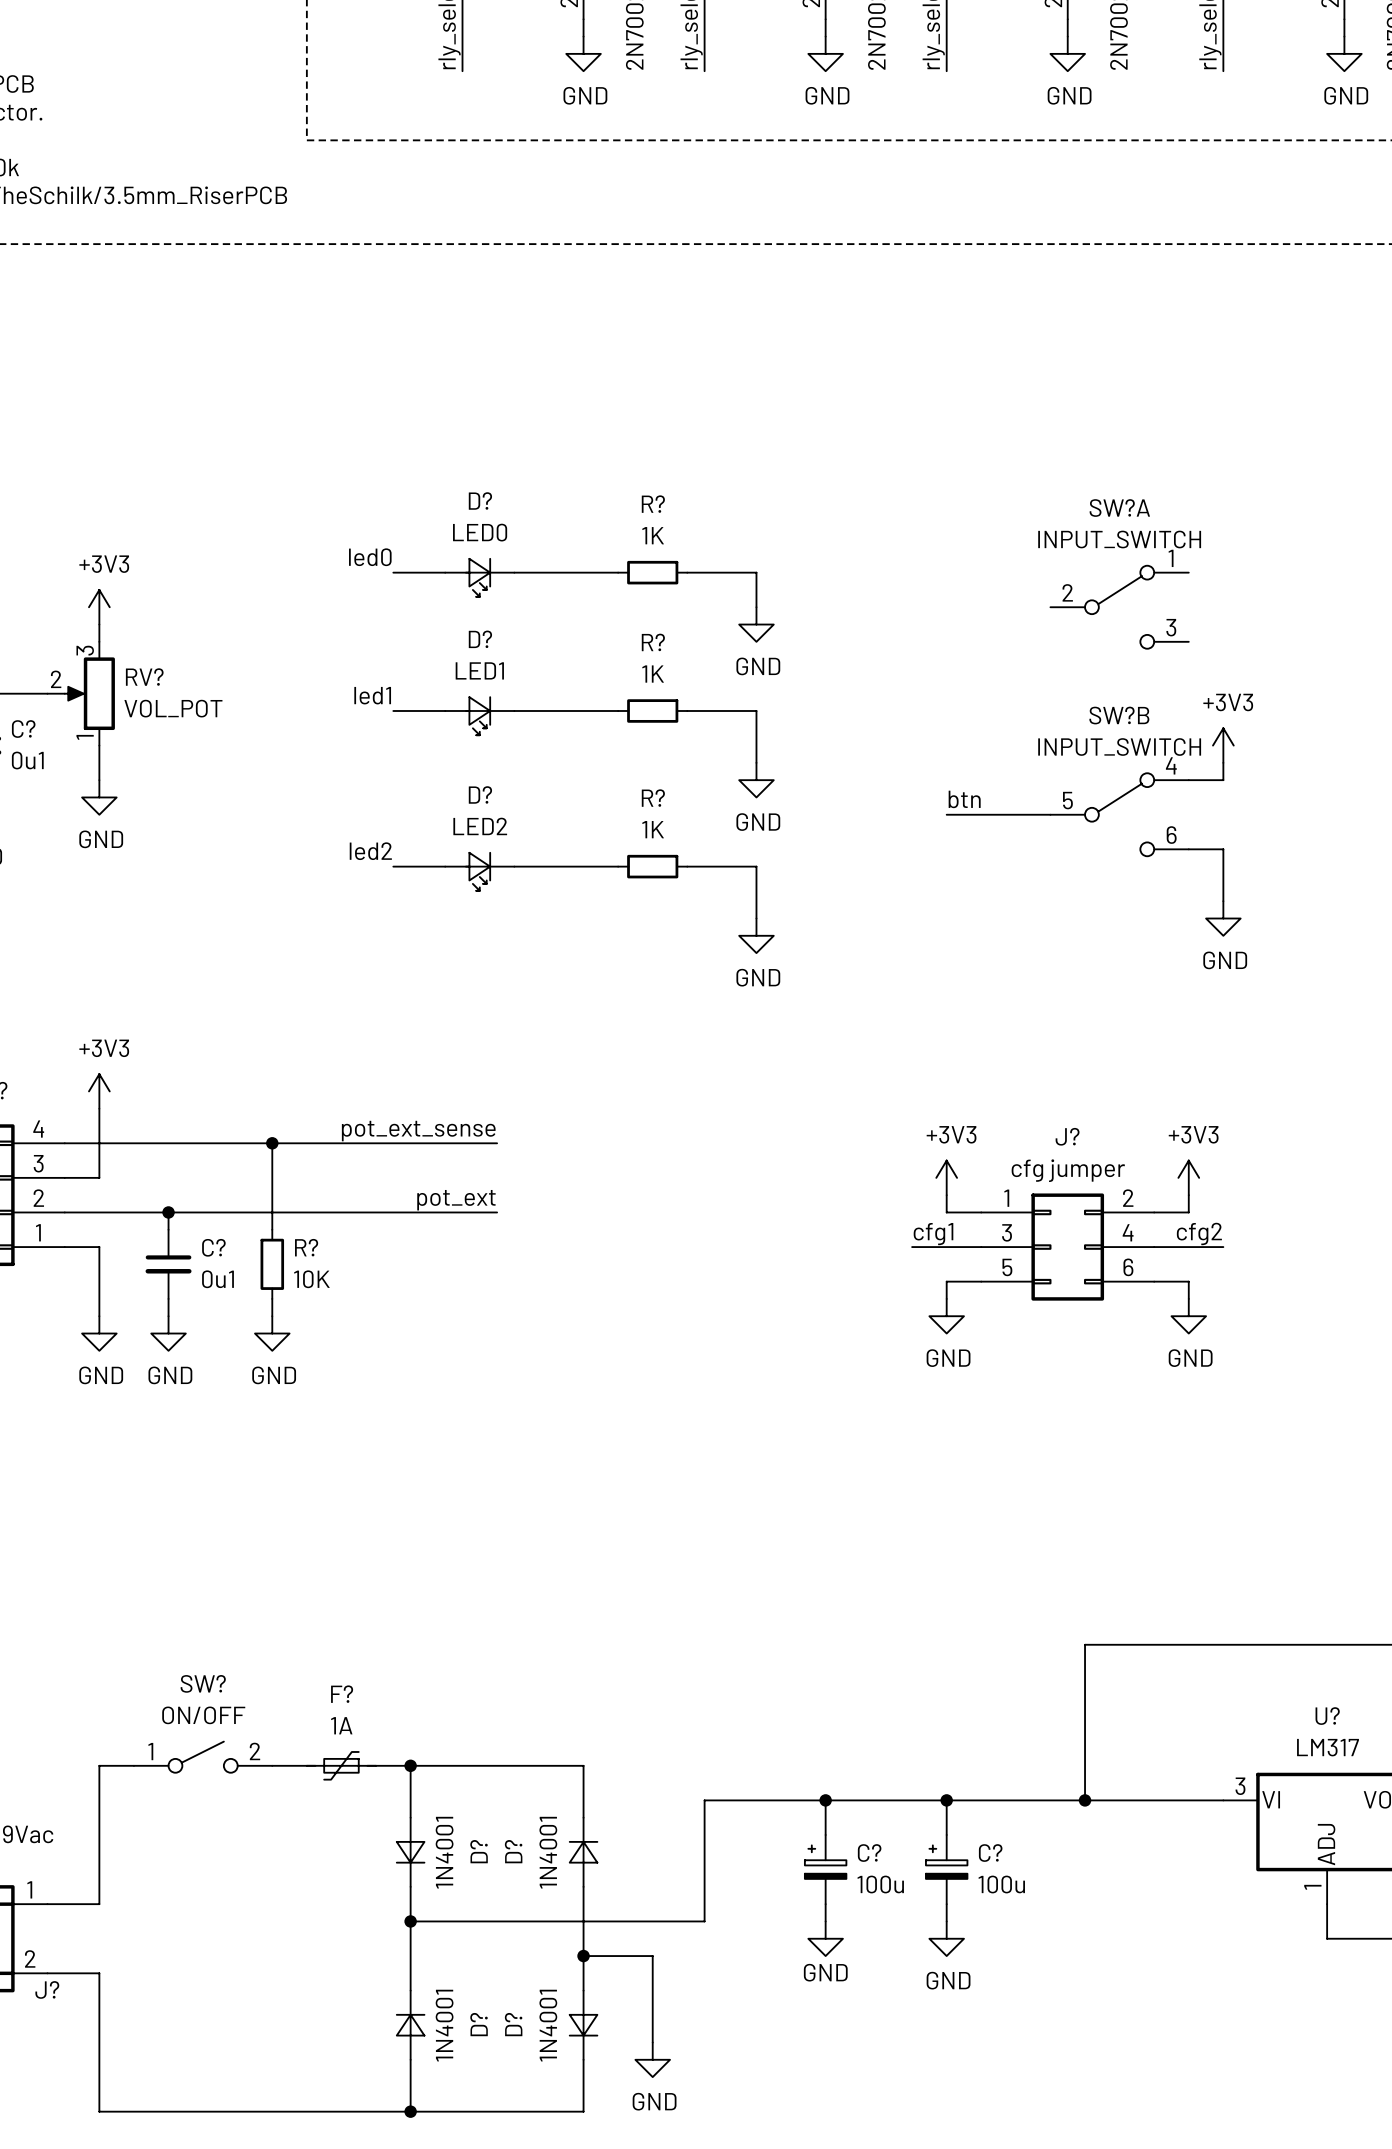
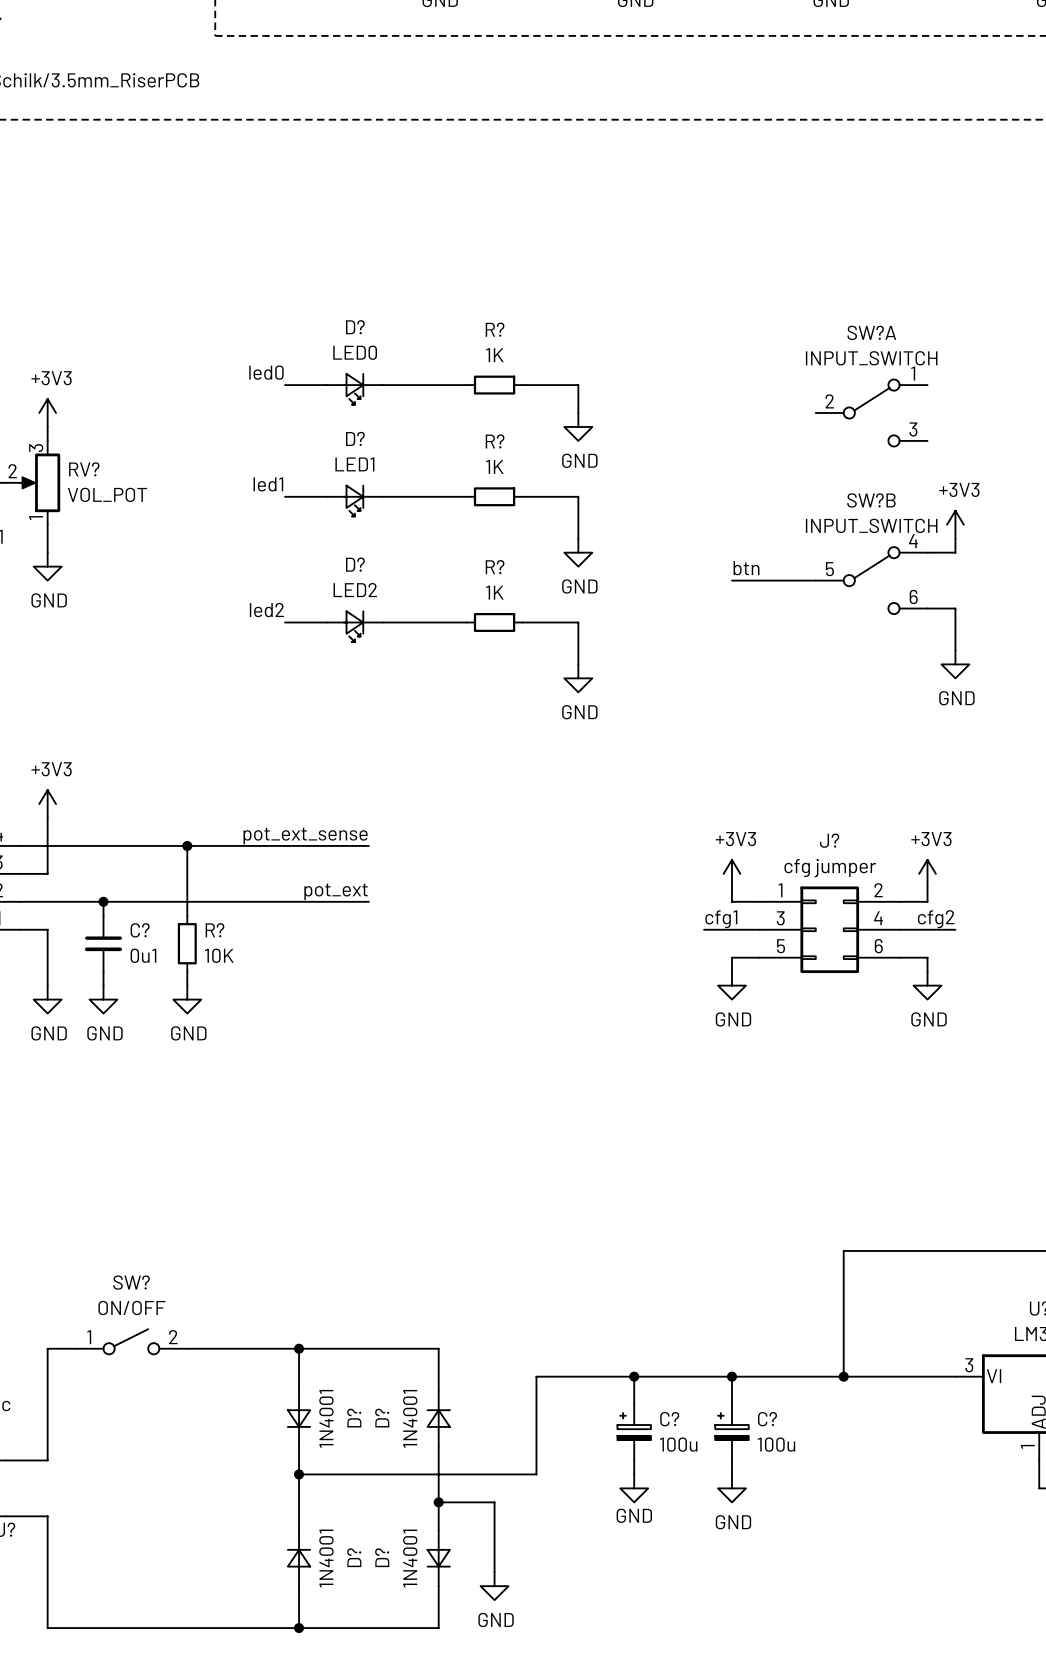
F?: 1A (341, 1765) -> none

